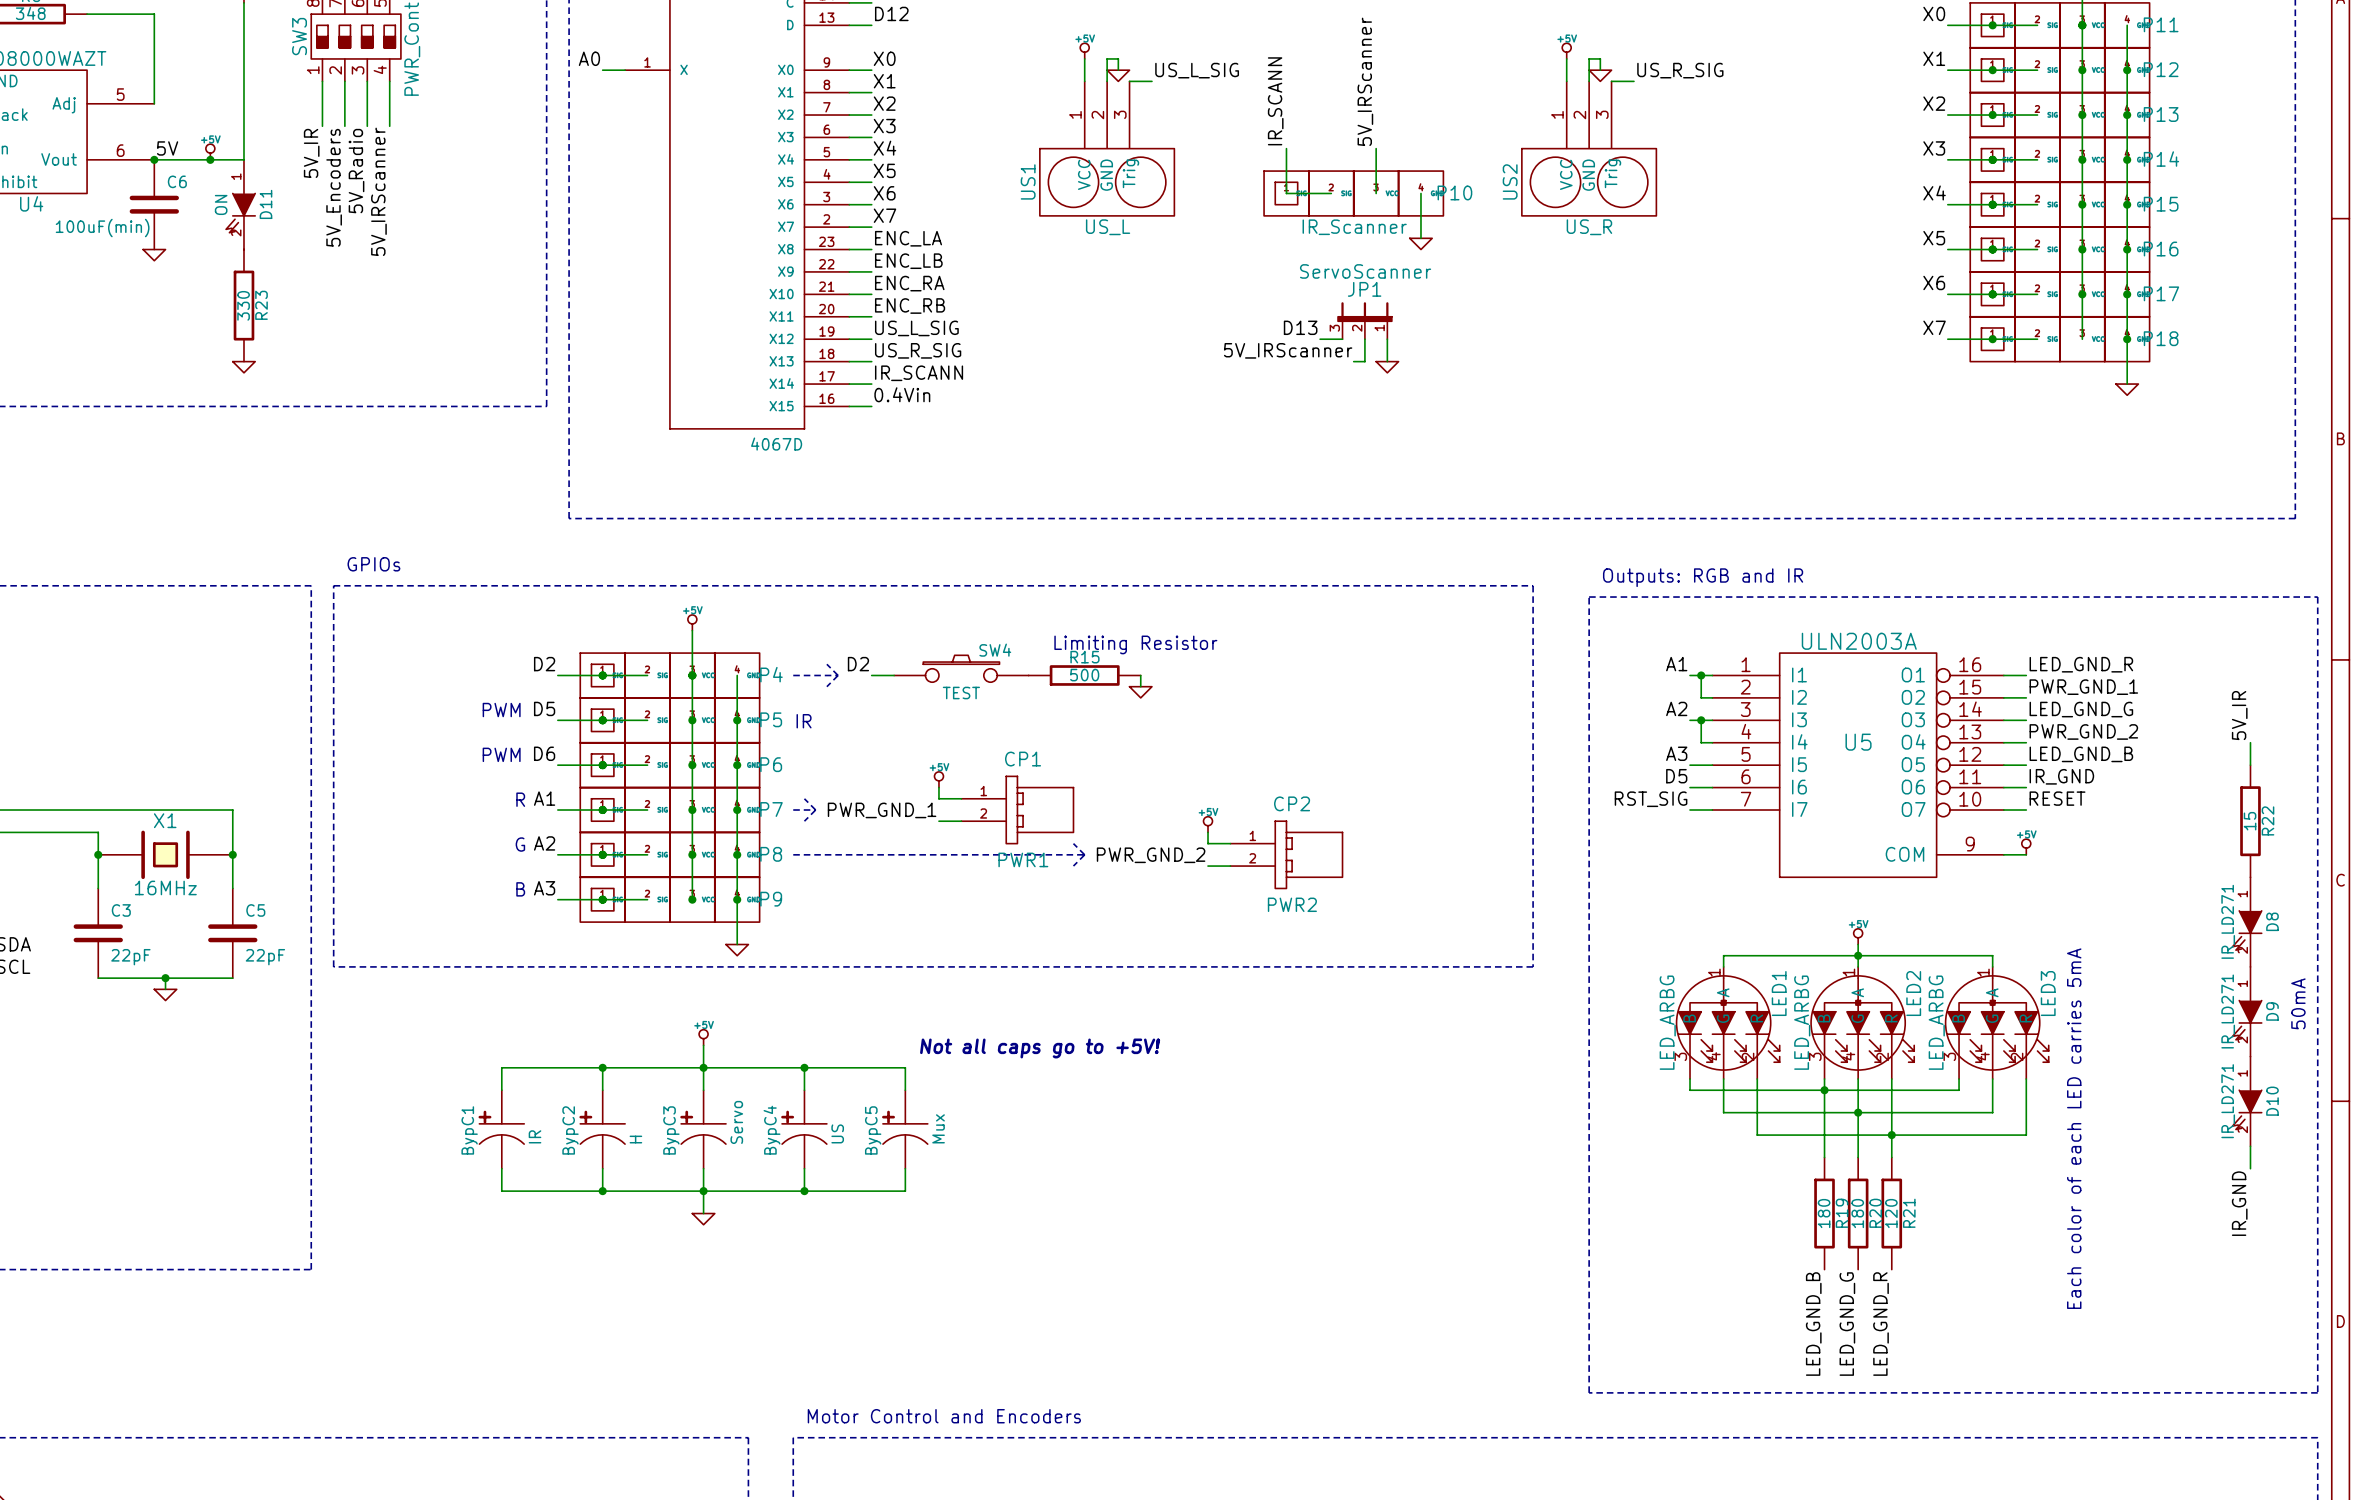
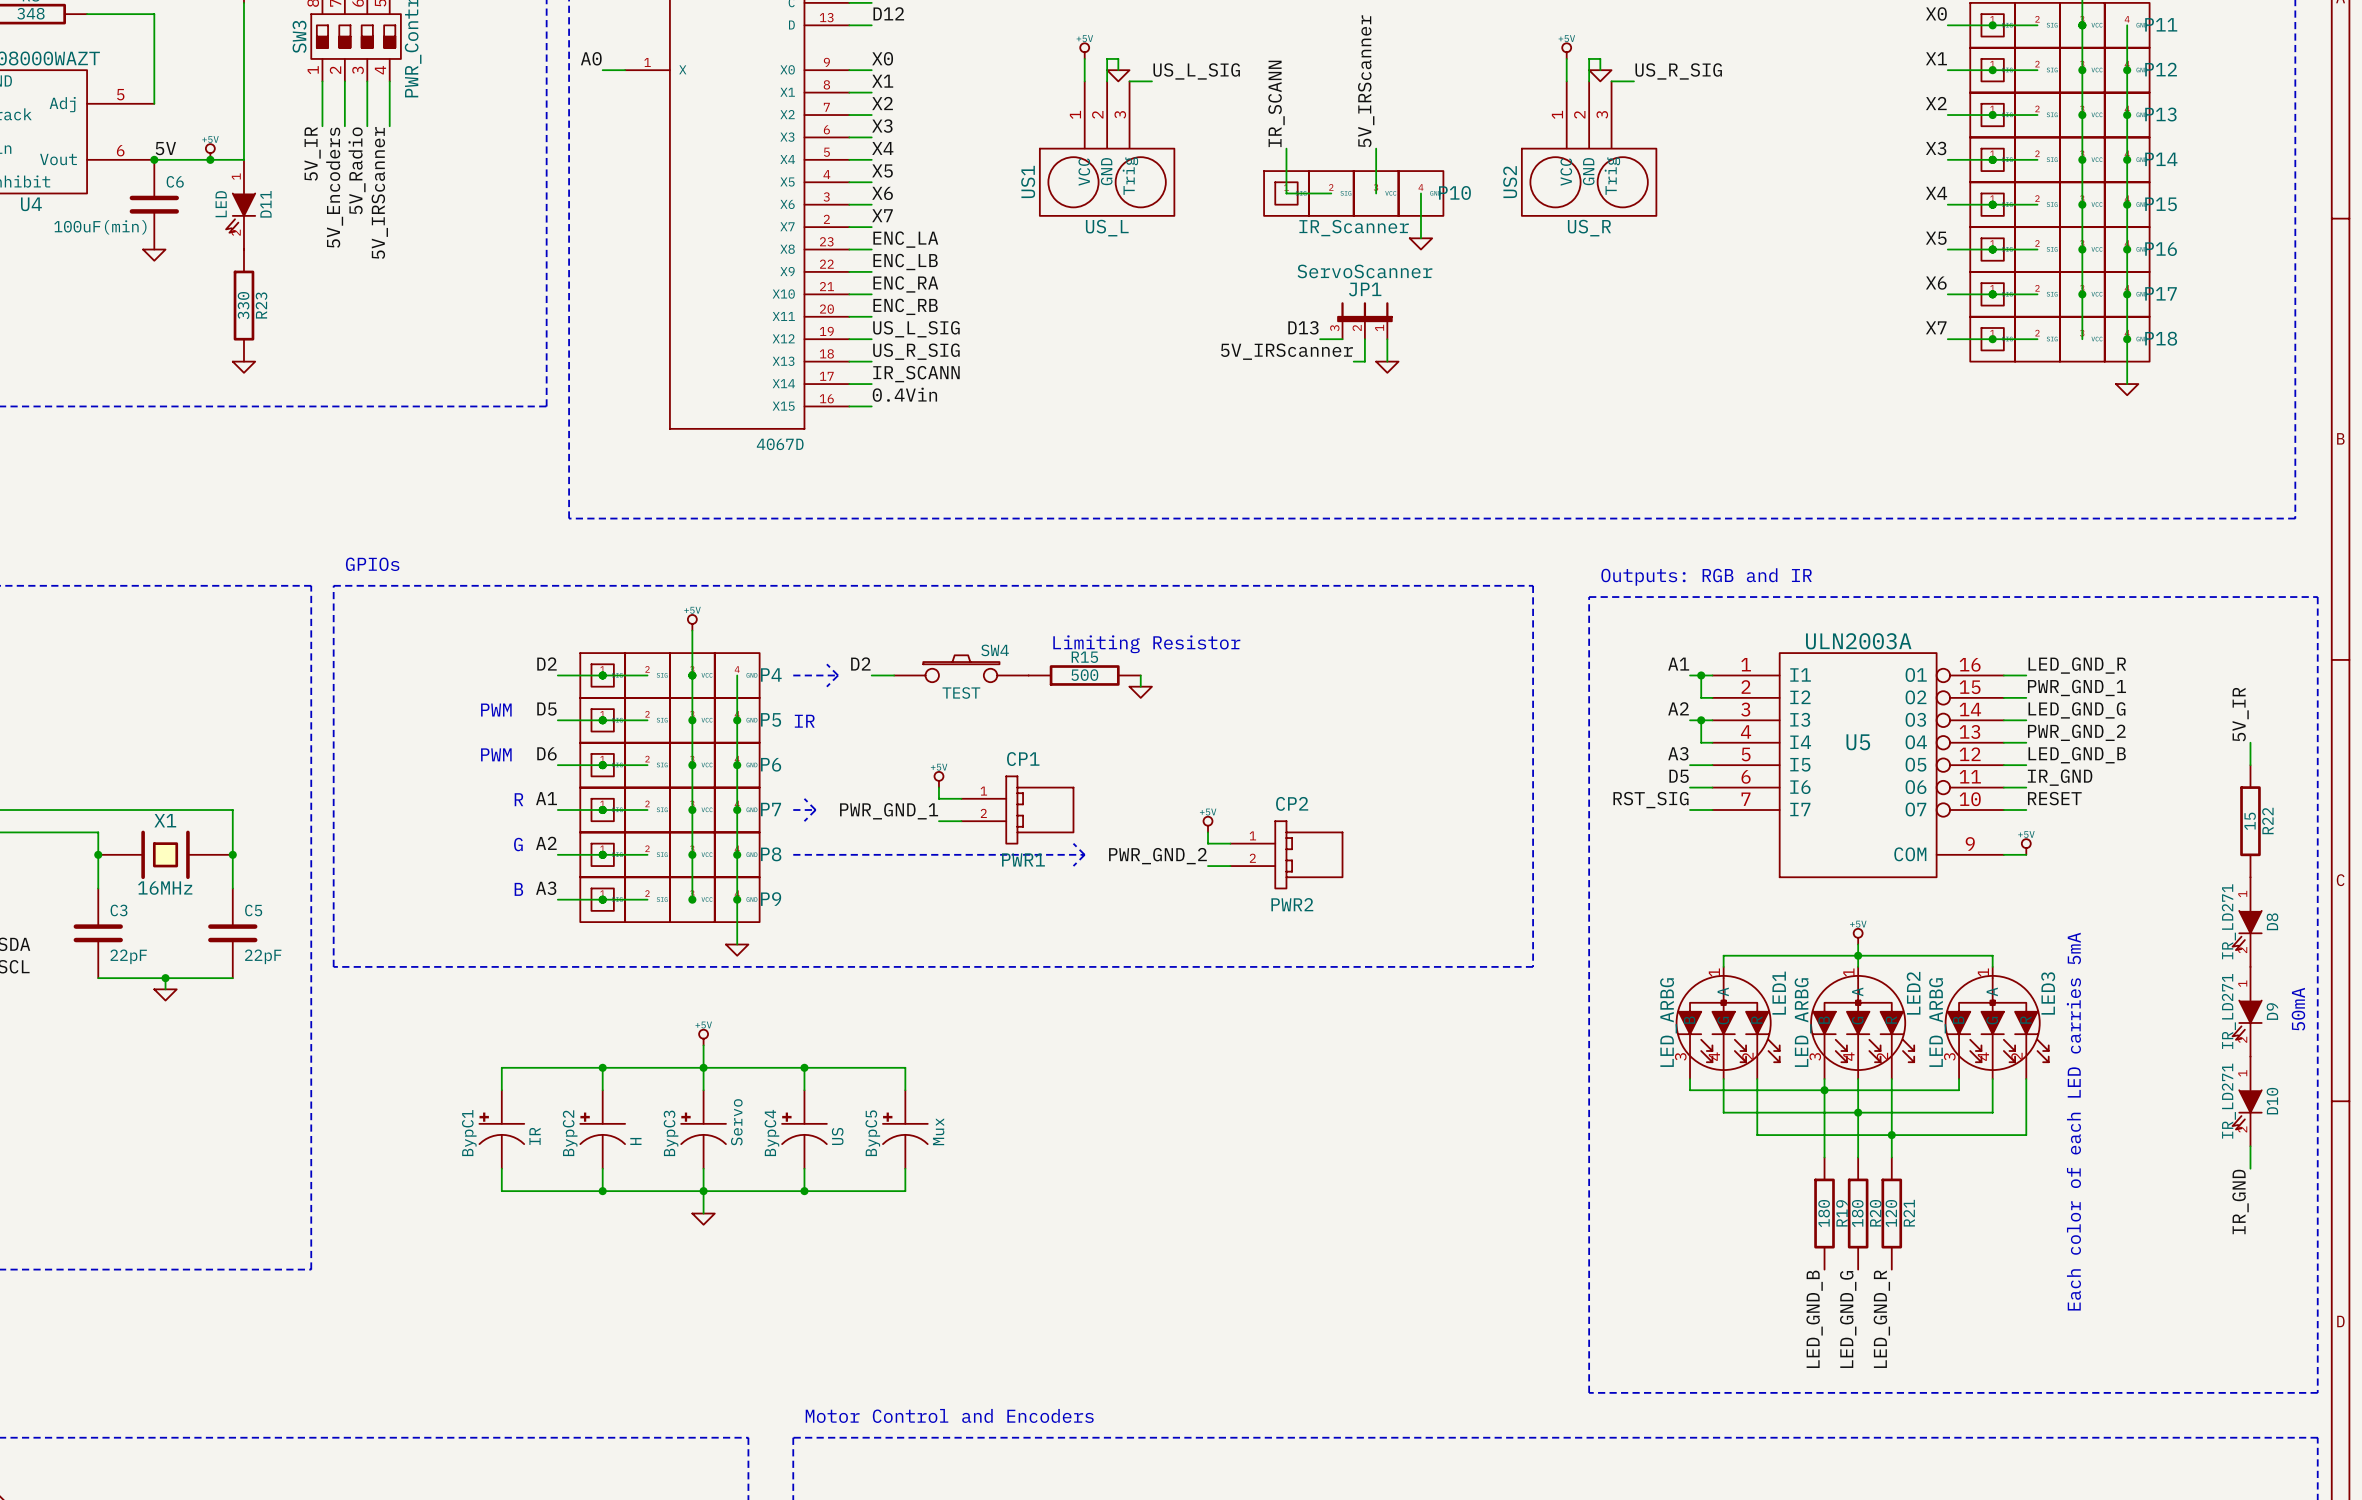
D11 value: ON (221, 204) -> LED (221, 204)
text: Not all caps go to +5V! (1040, 1048) -> none

